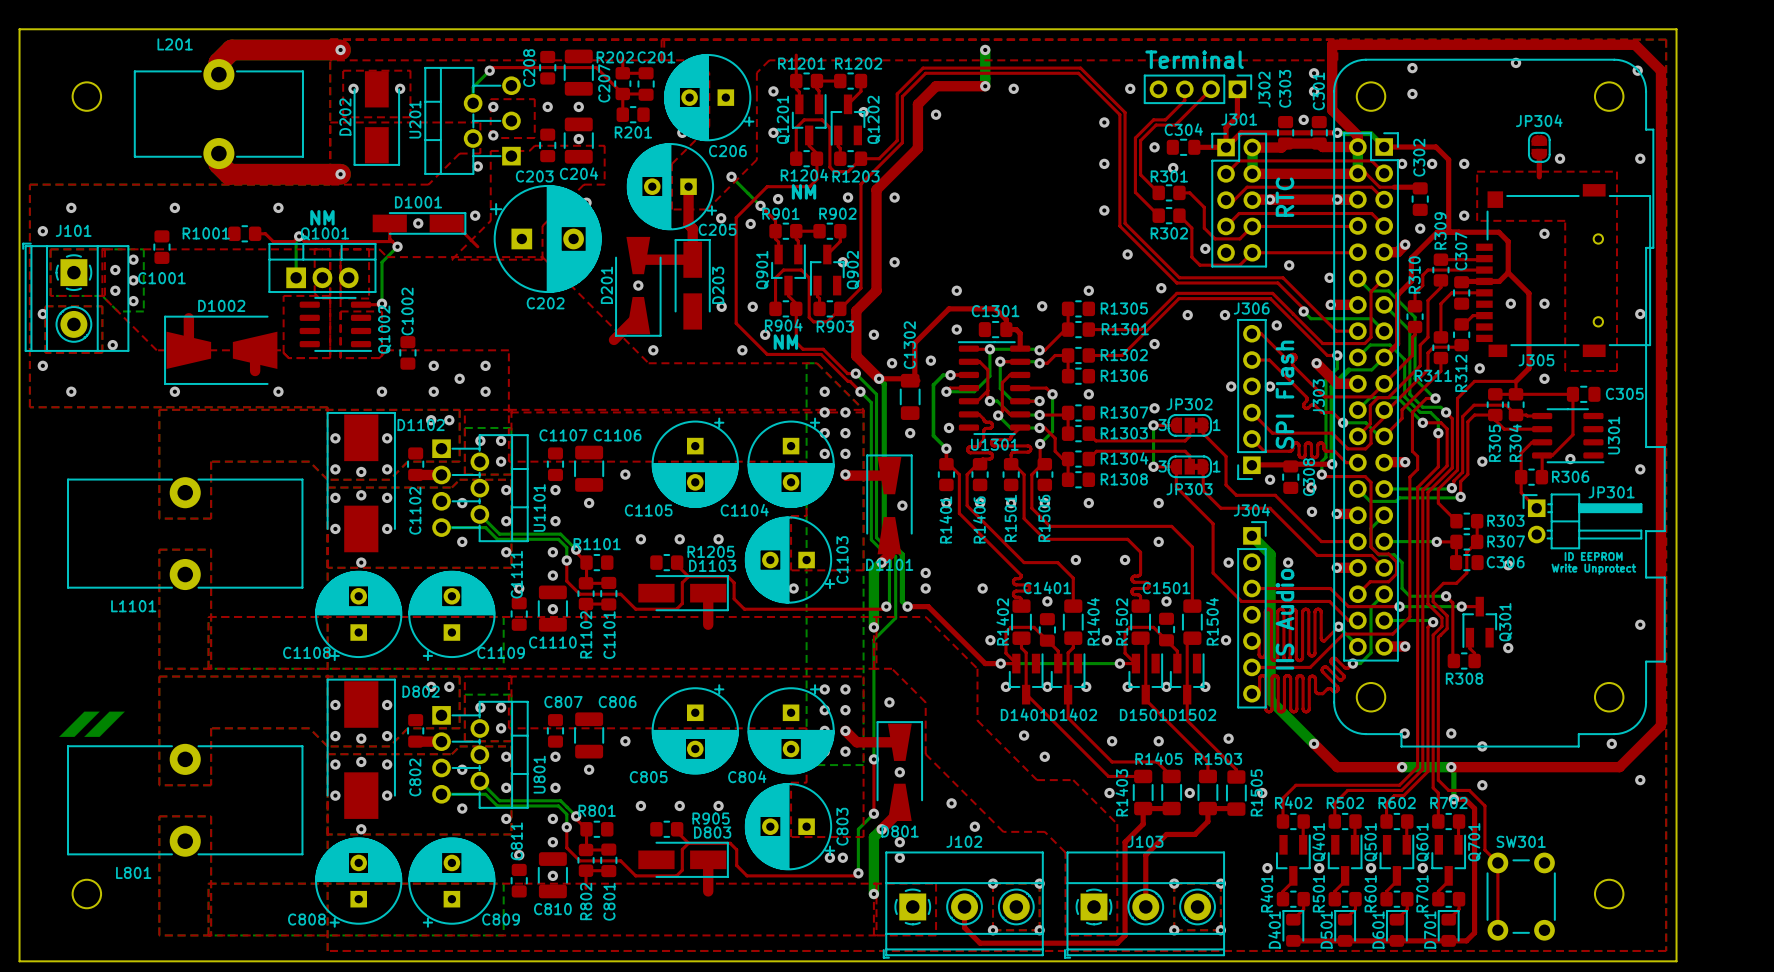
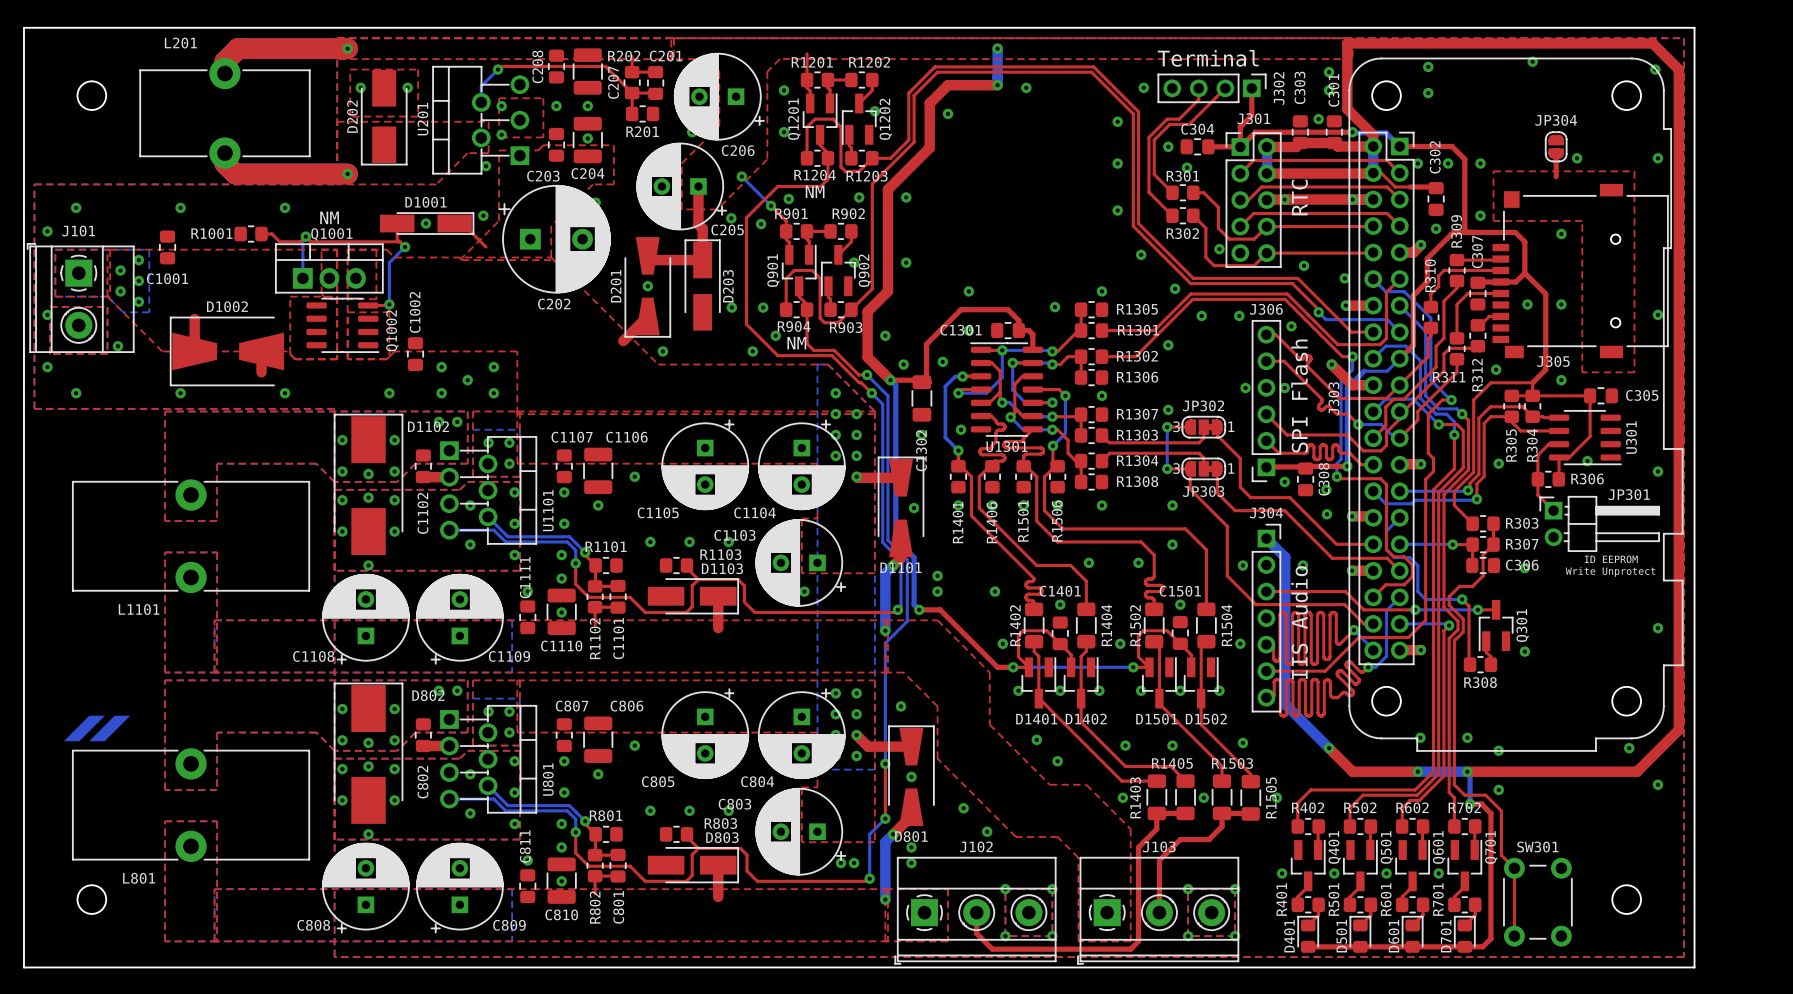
C1301 name position: C1301 (995, 311) -> C1301 (961, 330)
C1302 name position: C1302 (909, 345) -> C1302 (921, 450)
R1205 name: R1205 (711, 551) -> R1103 (720, 554)
C1103 name rotation: 0° (842, 560) -> 90° clockwise (734, 535)
C1103 name position: C1103 (842, 560) -> C1103 (734, 535)
R905 name: R905 (711, 818) -> R803 (720, 823)
C803 name rotation: 0° (842, 826) -> 90° clockwise (734, 804)
C803 name position: C803 (842, 826) -> C803 (734, 804)

